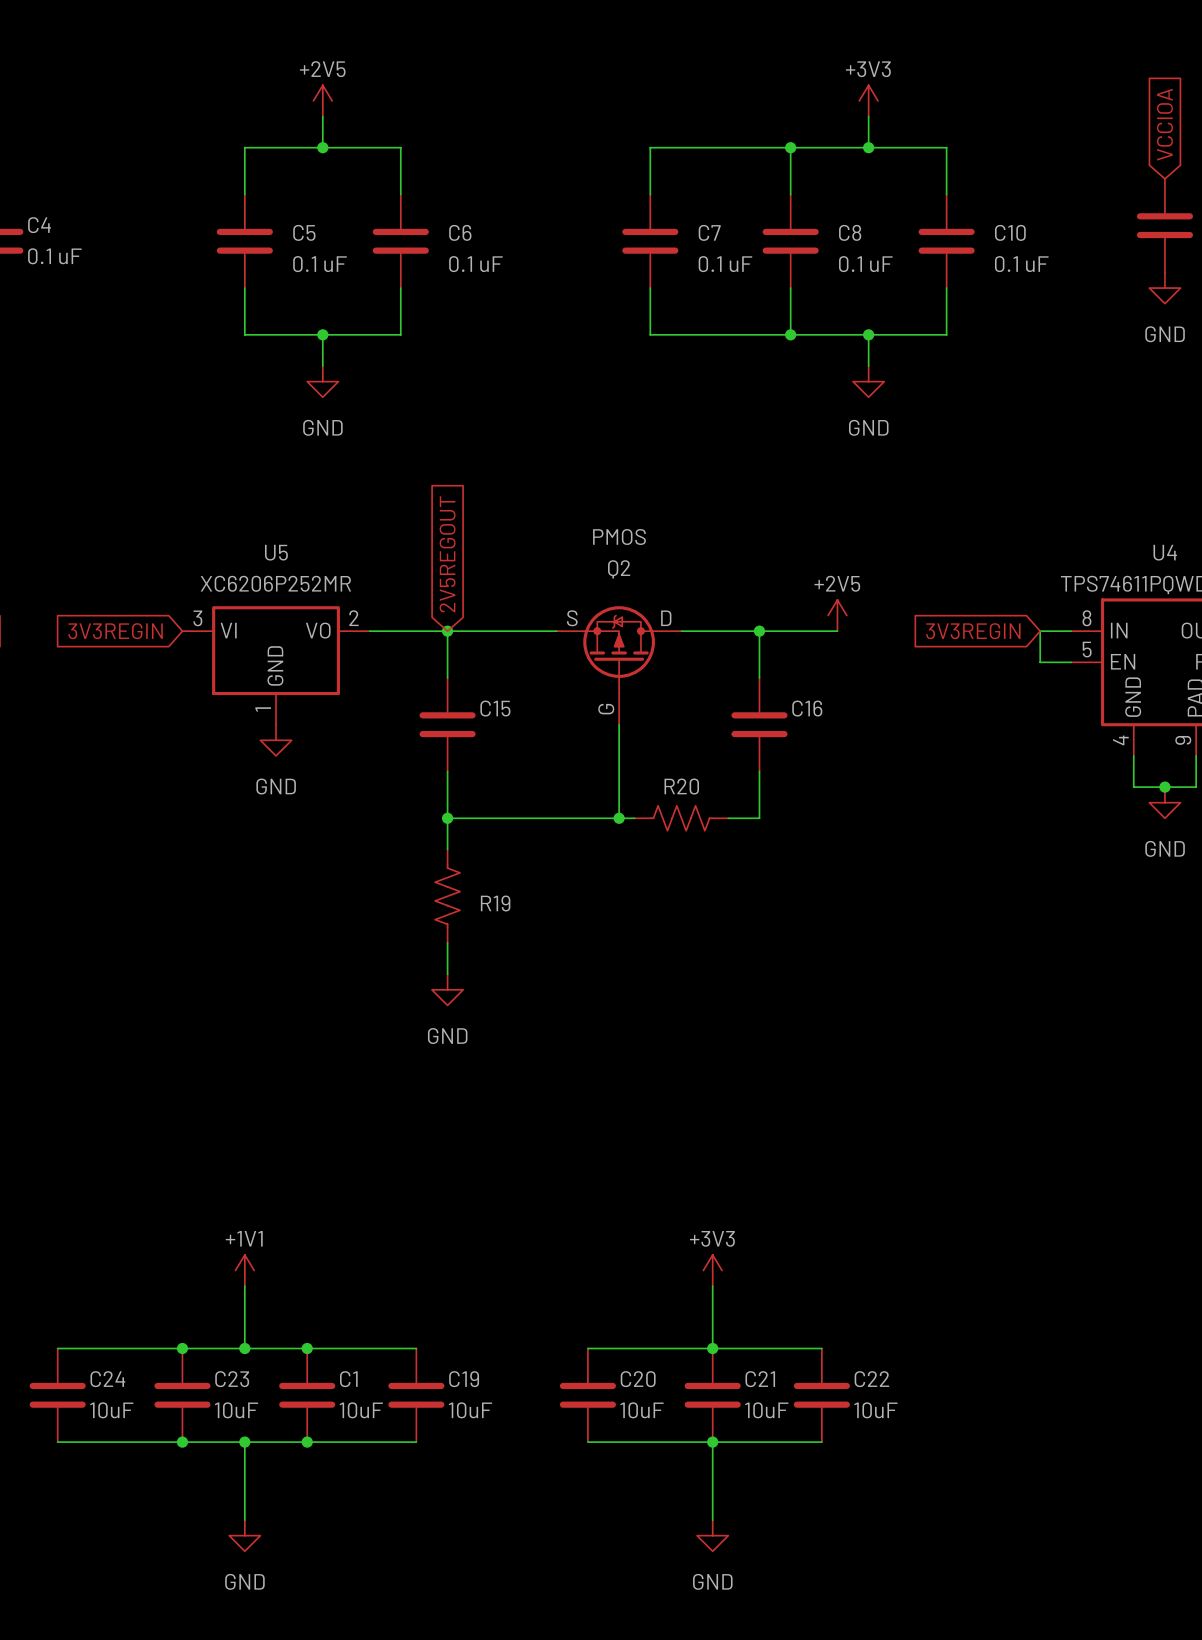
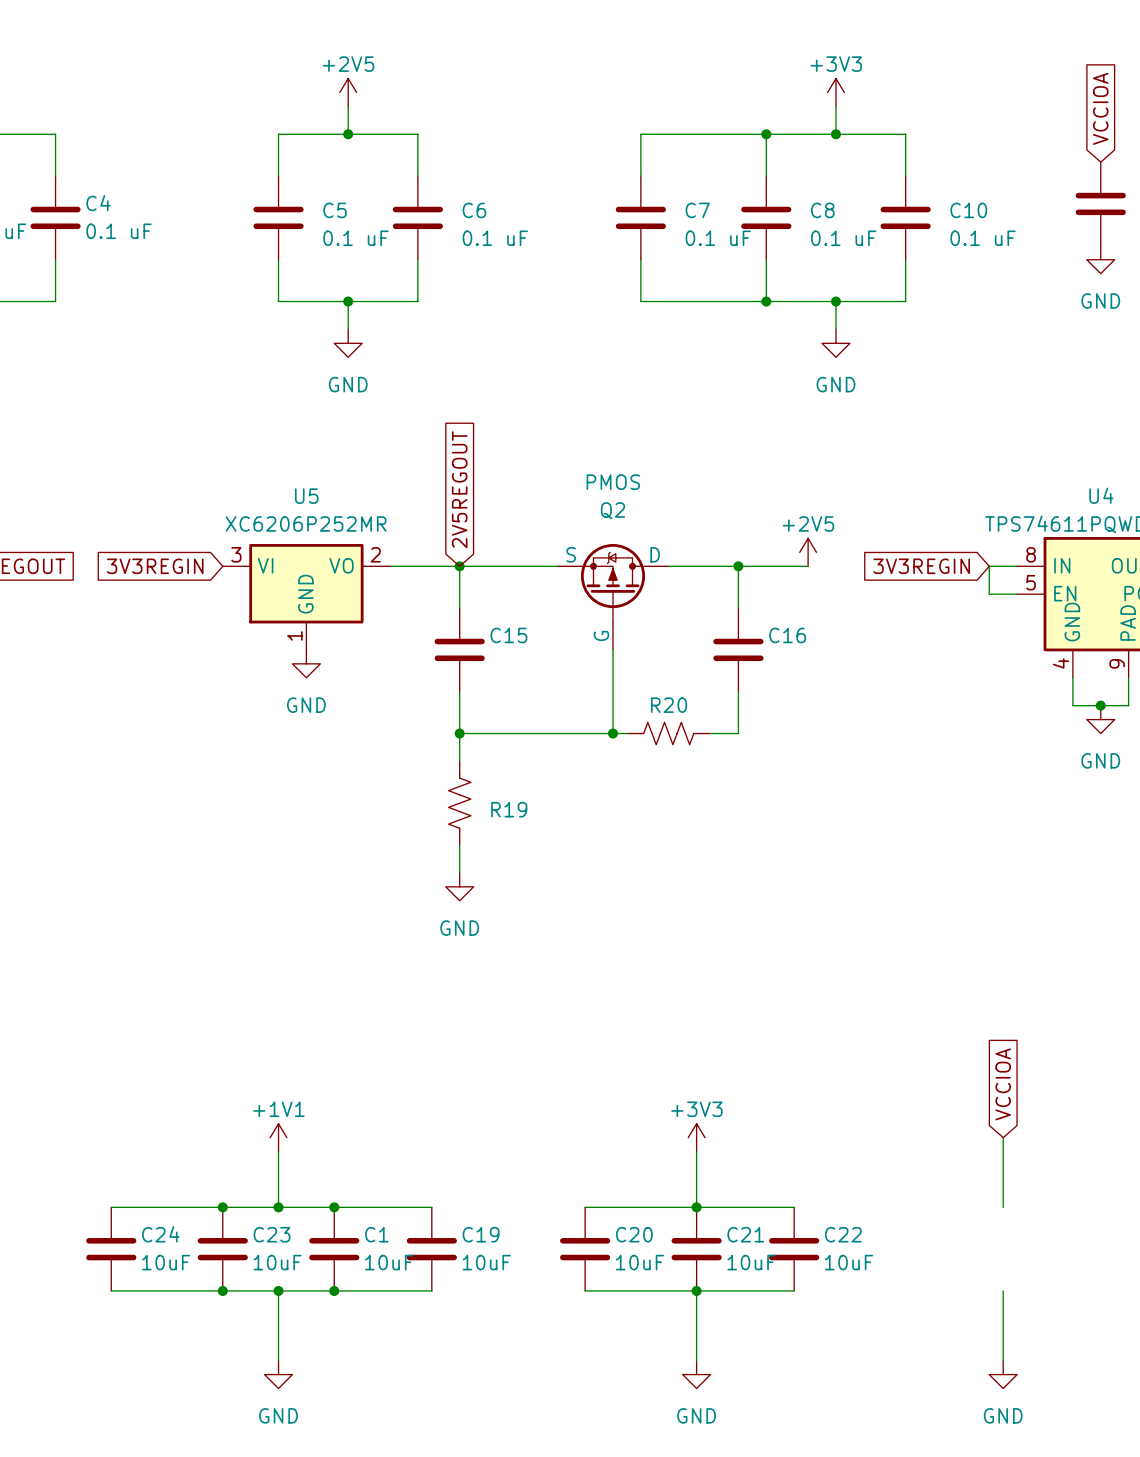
global label: none -> VCCIOA (1003, 1084)
wire: none -> (1003, 1137) (1003, 1207)
wire: none -> (1003, 1290) (1003, 1360)
power symbol: none -> GND (1003, 1374)

